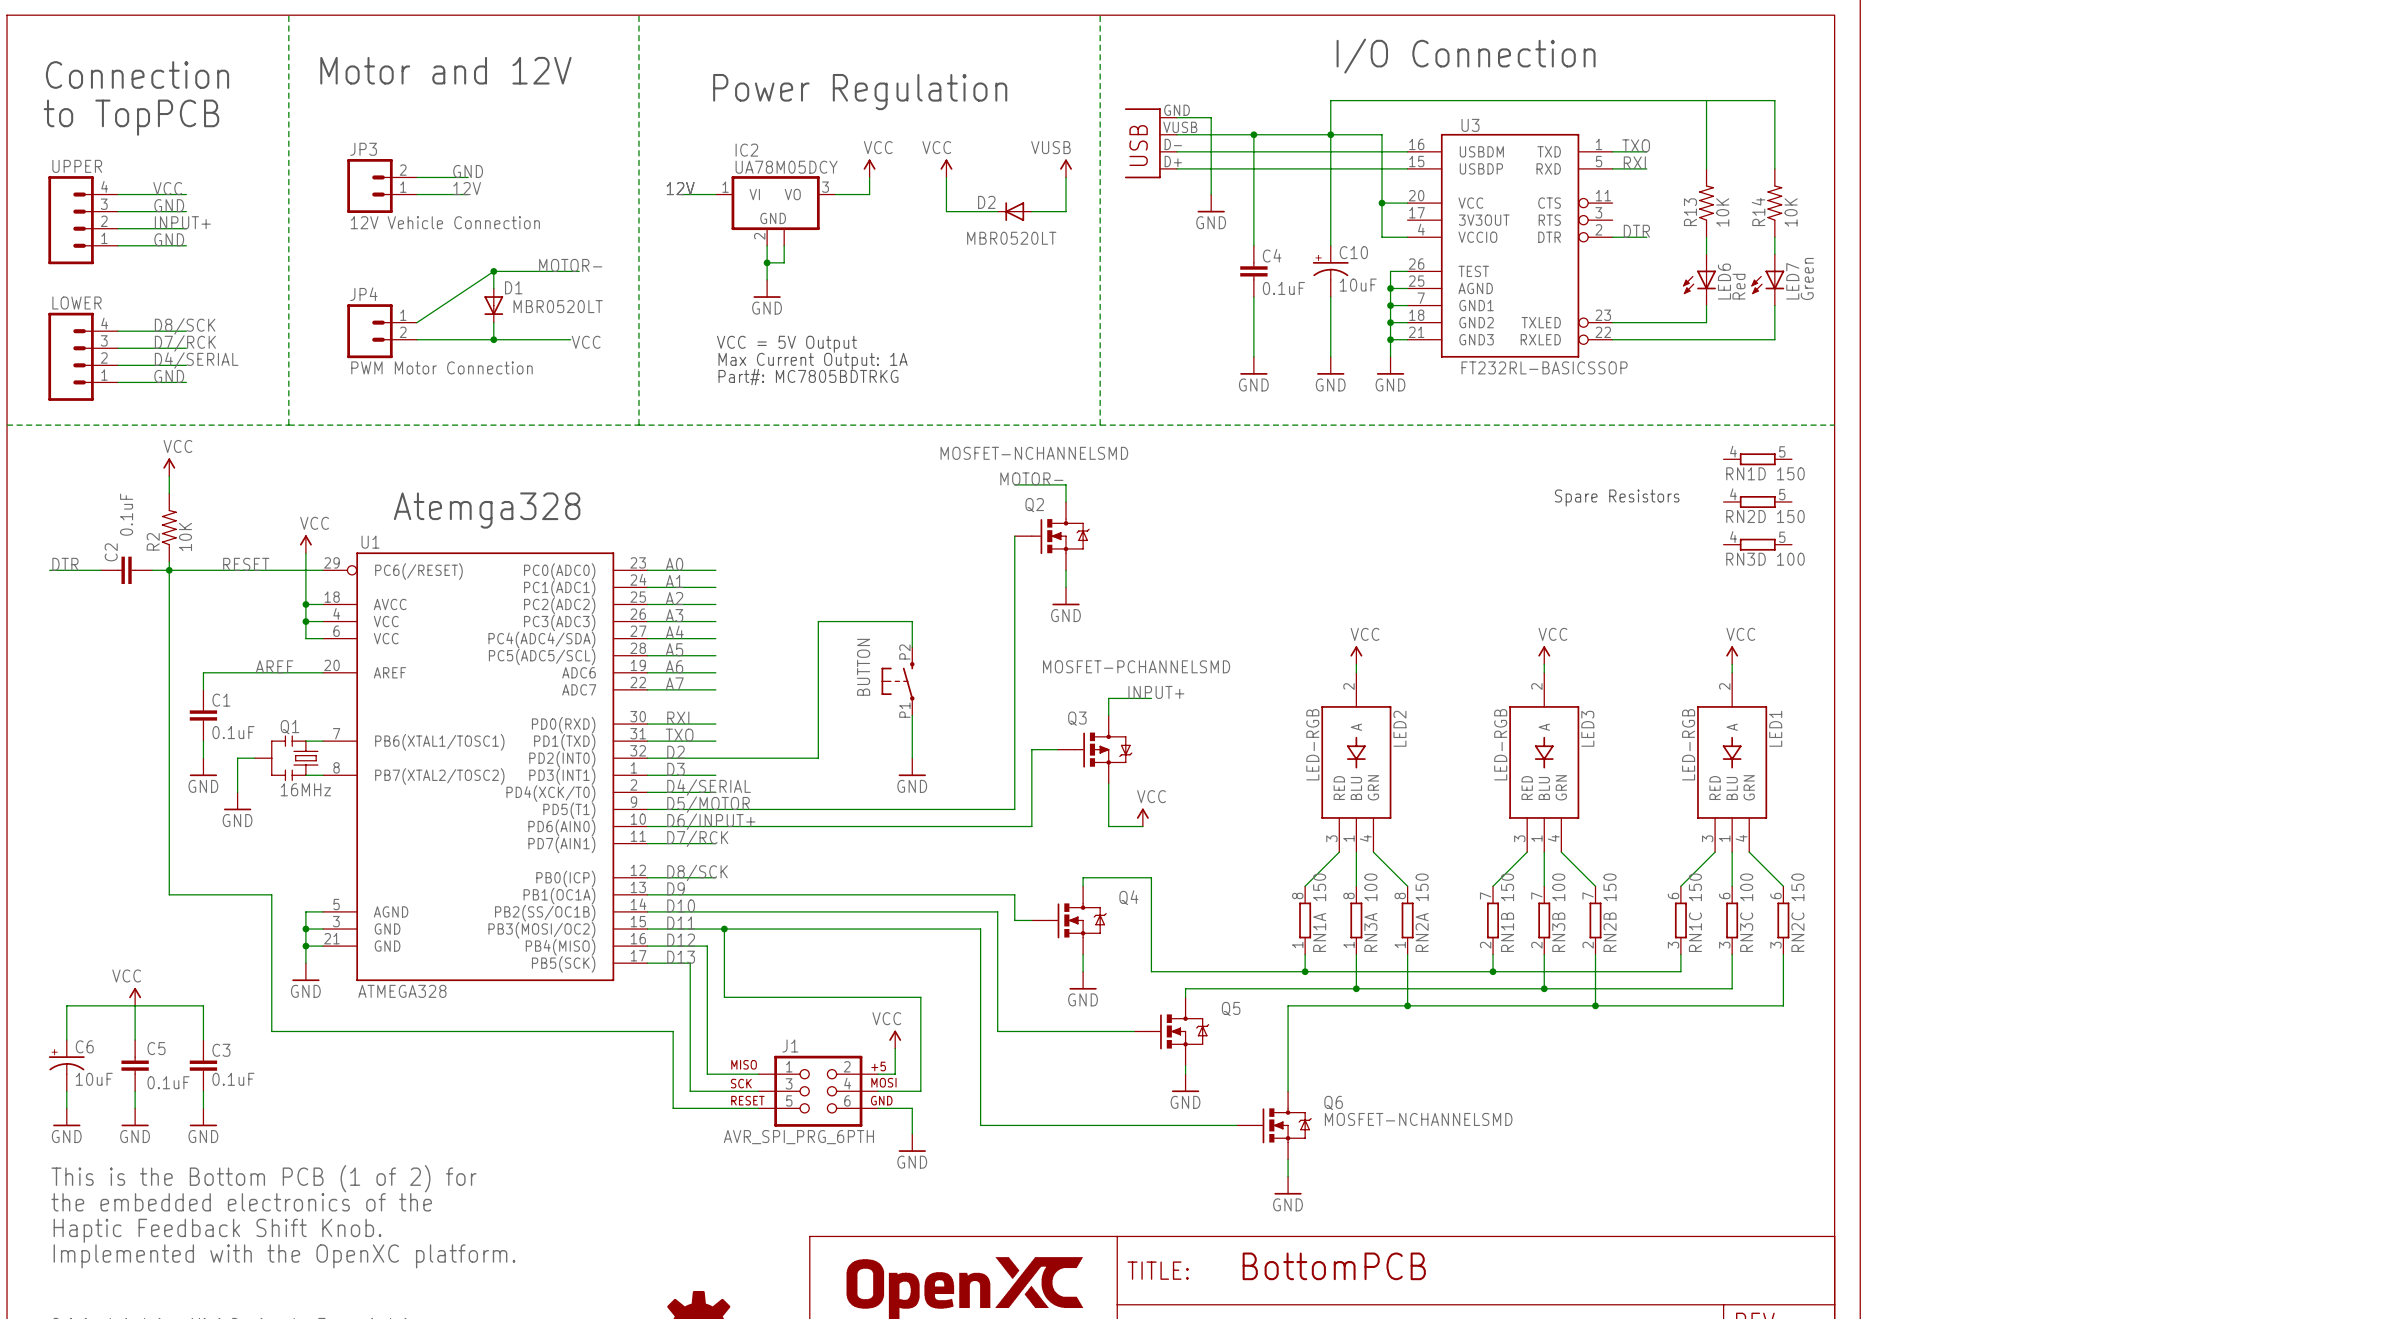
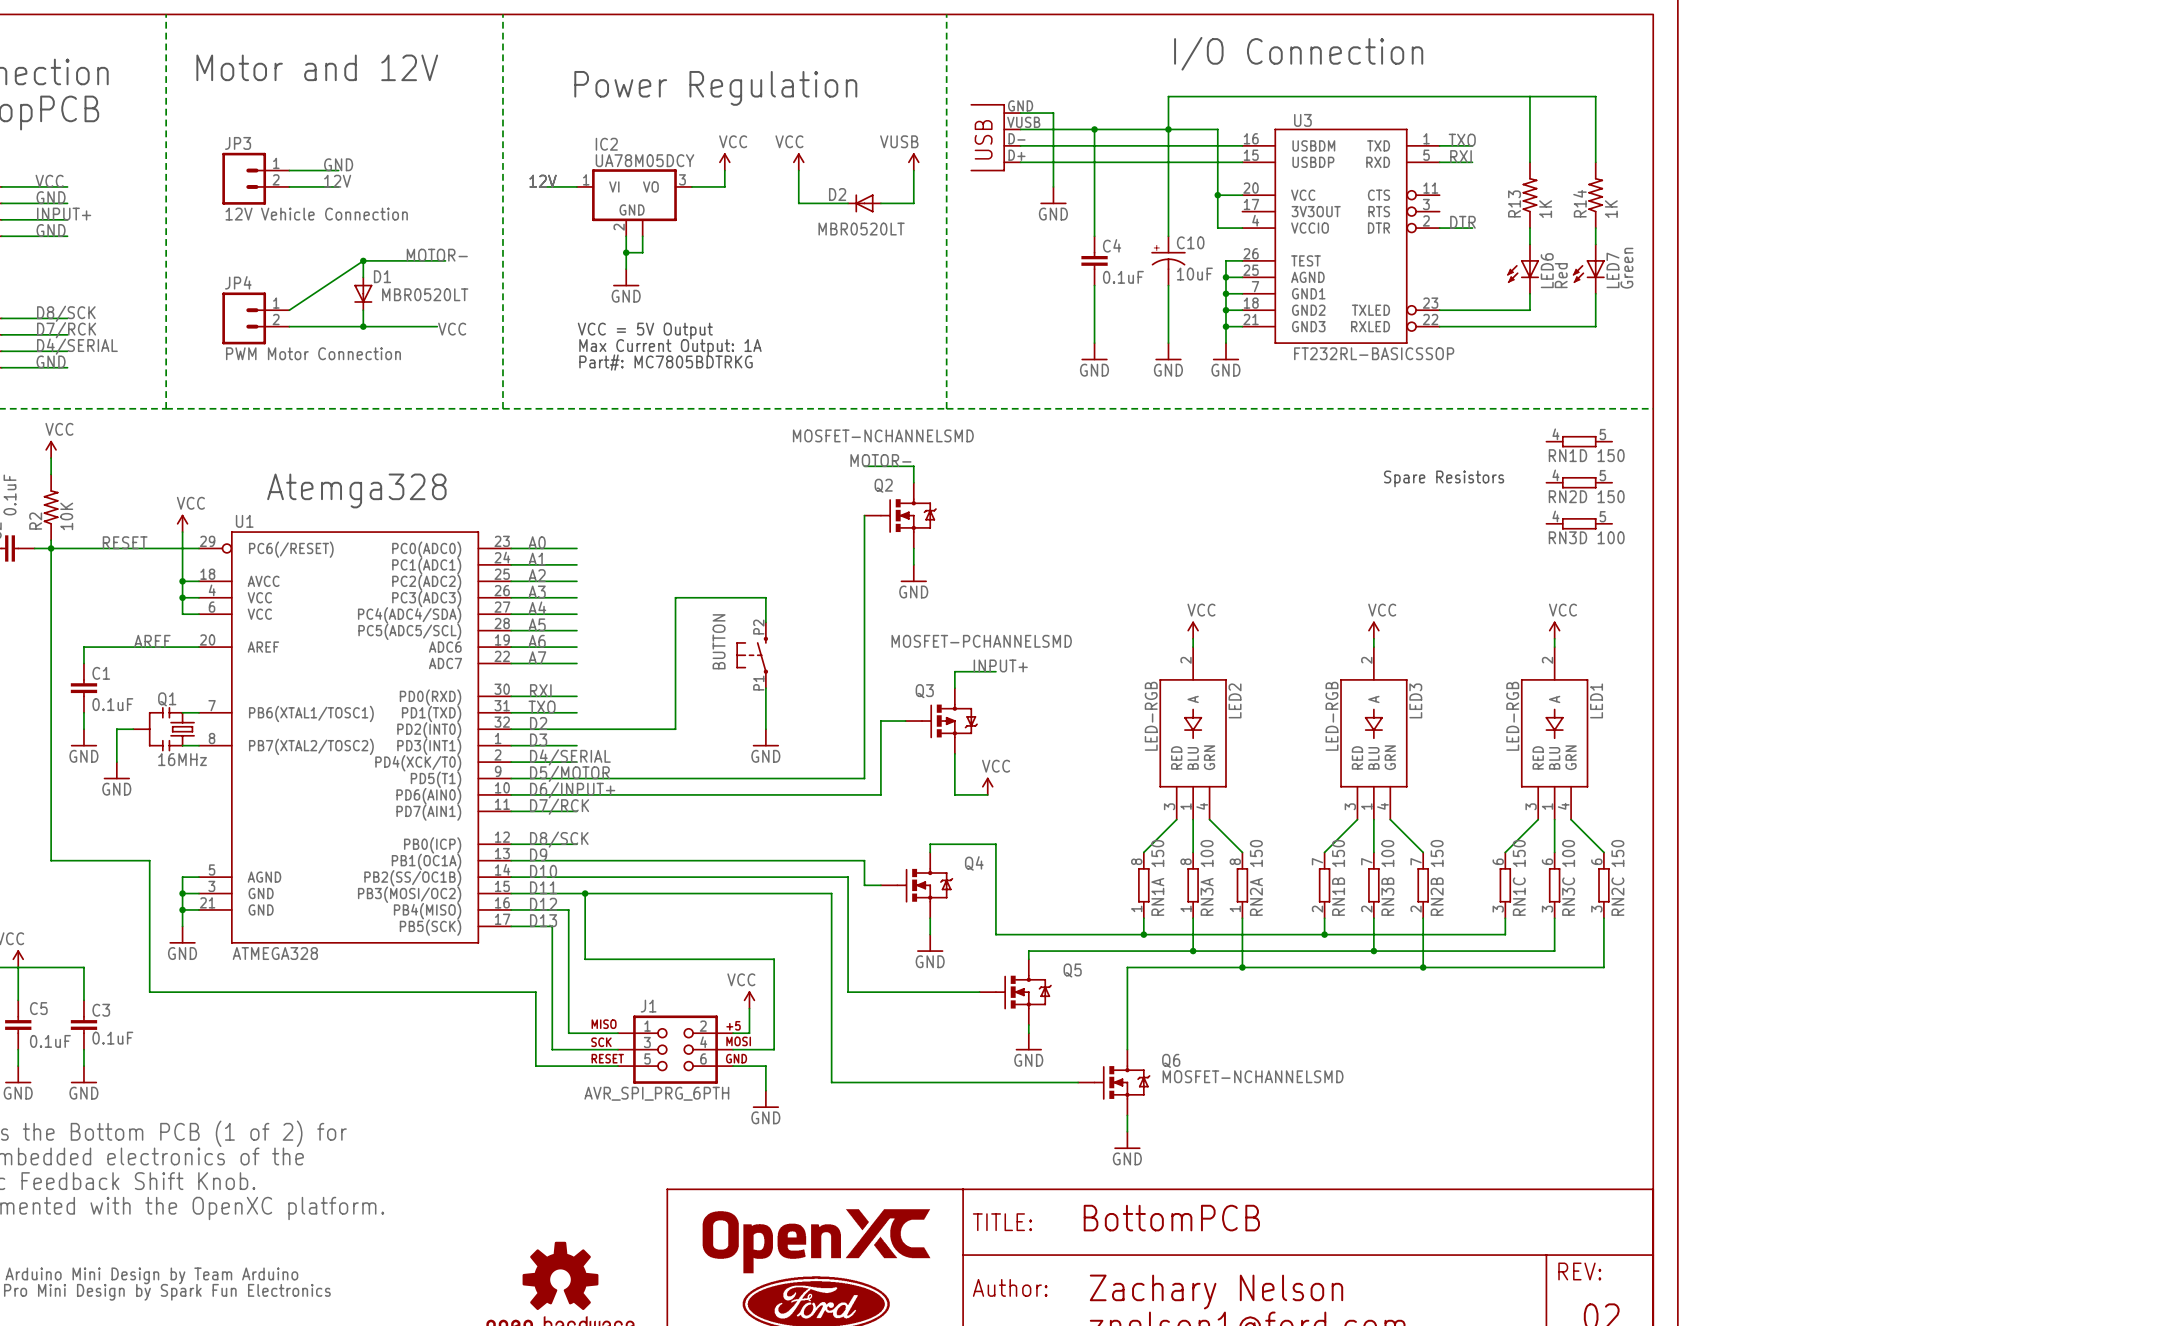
JP3 flip: as is (369, 186) -> up-down (244, 178)
R13 value: 10K (1722, 212) -> 1K (1545, 209)
R14 value: 10K (1791, 212) -> 1K (1611, 209)

